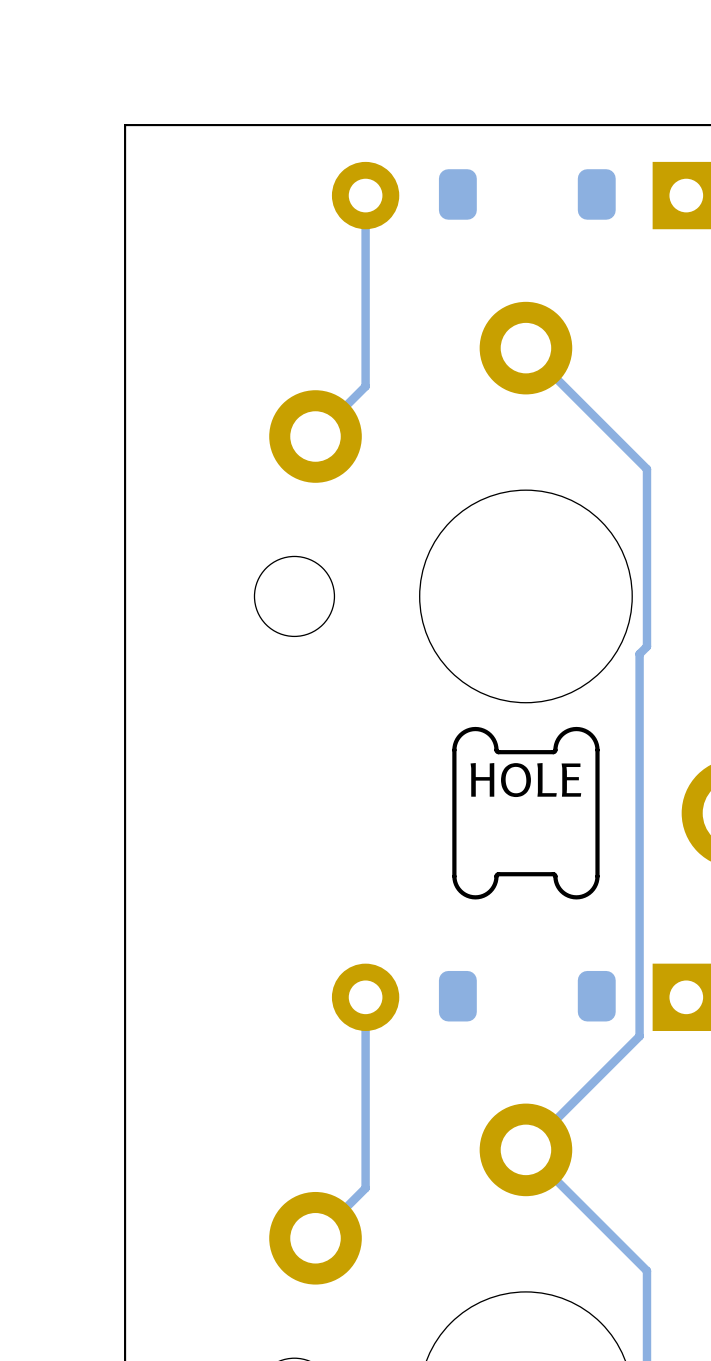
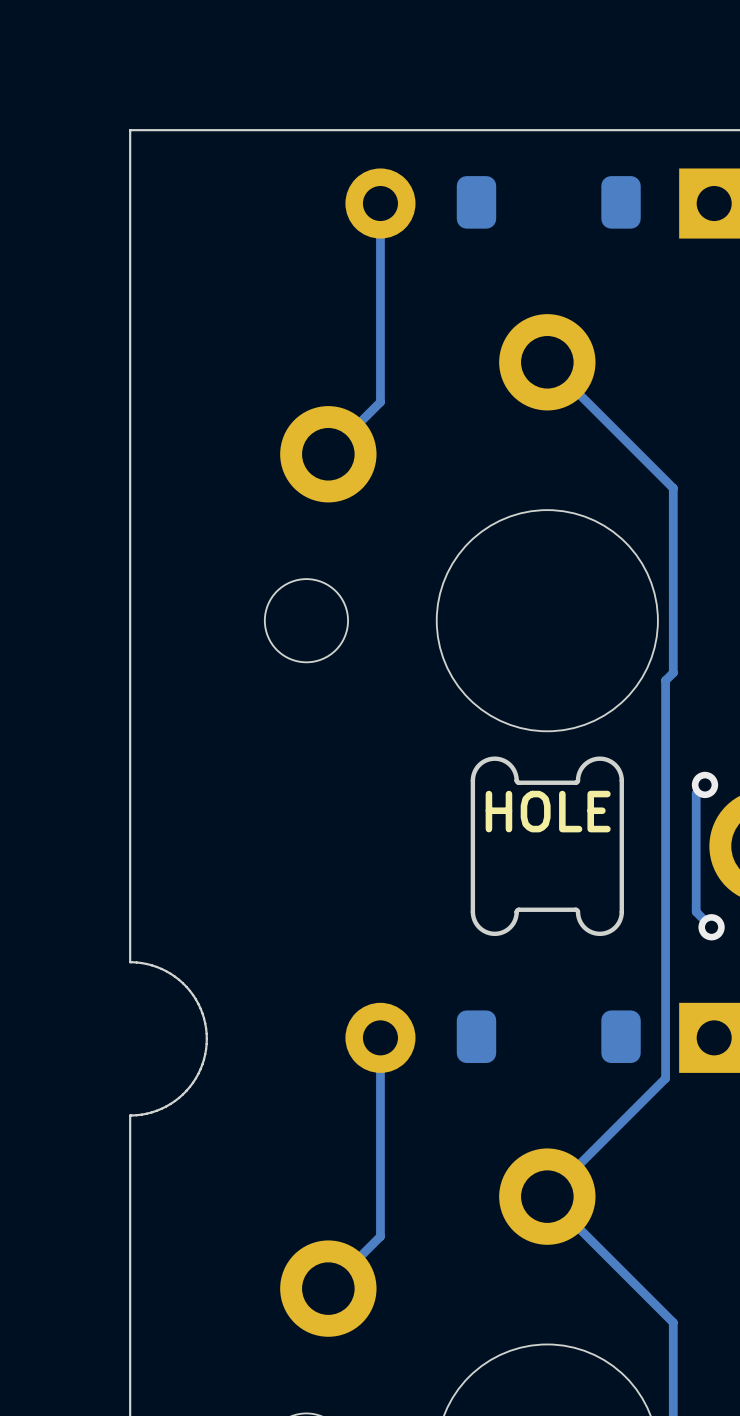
track: none -> (705, 784) (696, 793) (696, 911) (711, 927)
via: none -> (705, 784)
via: none -> (711, 927)
board edge: (125, 924) (125, 1071) -> (130, 962) (156, 966) (170, 973) (182, 983) (193, 995) (200, 1008) (205, 1023) (206, 1038) (205, 1054) (200, 1069) (193, 1082) (182, 1094) (170, 1103) (156, 1110) (130, 1115)

